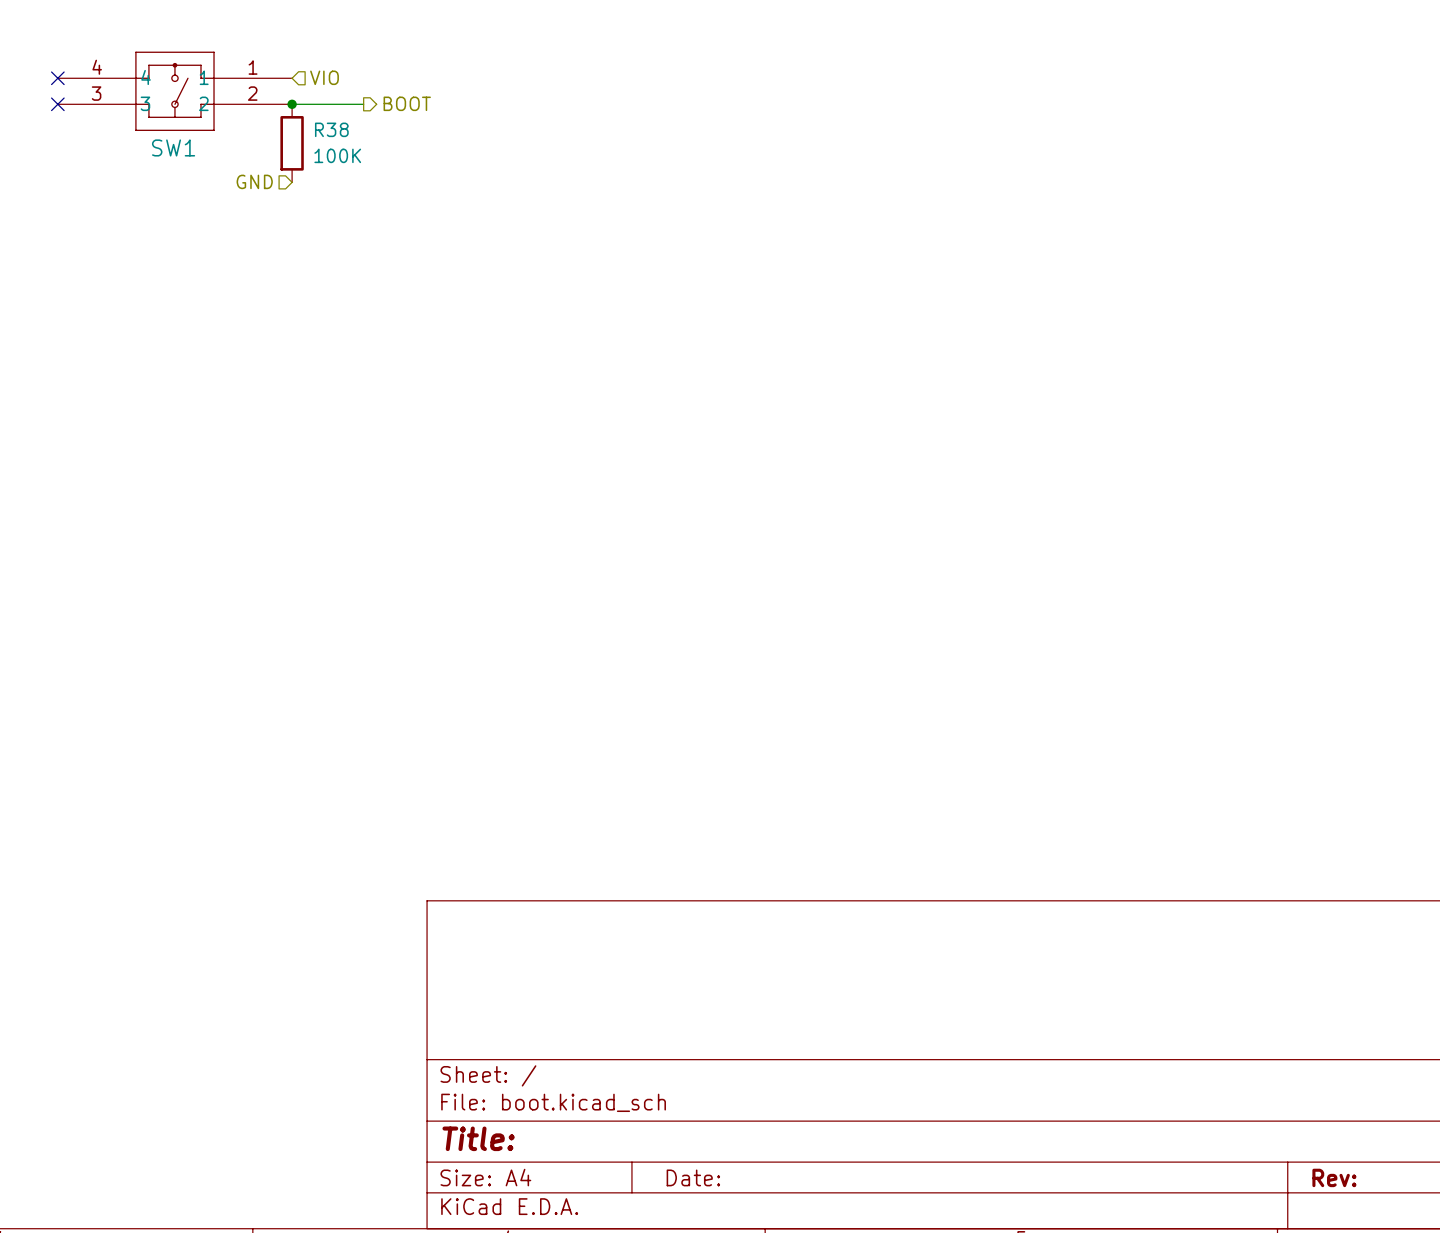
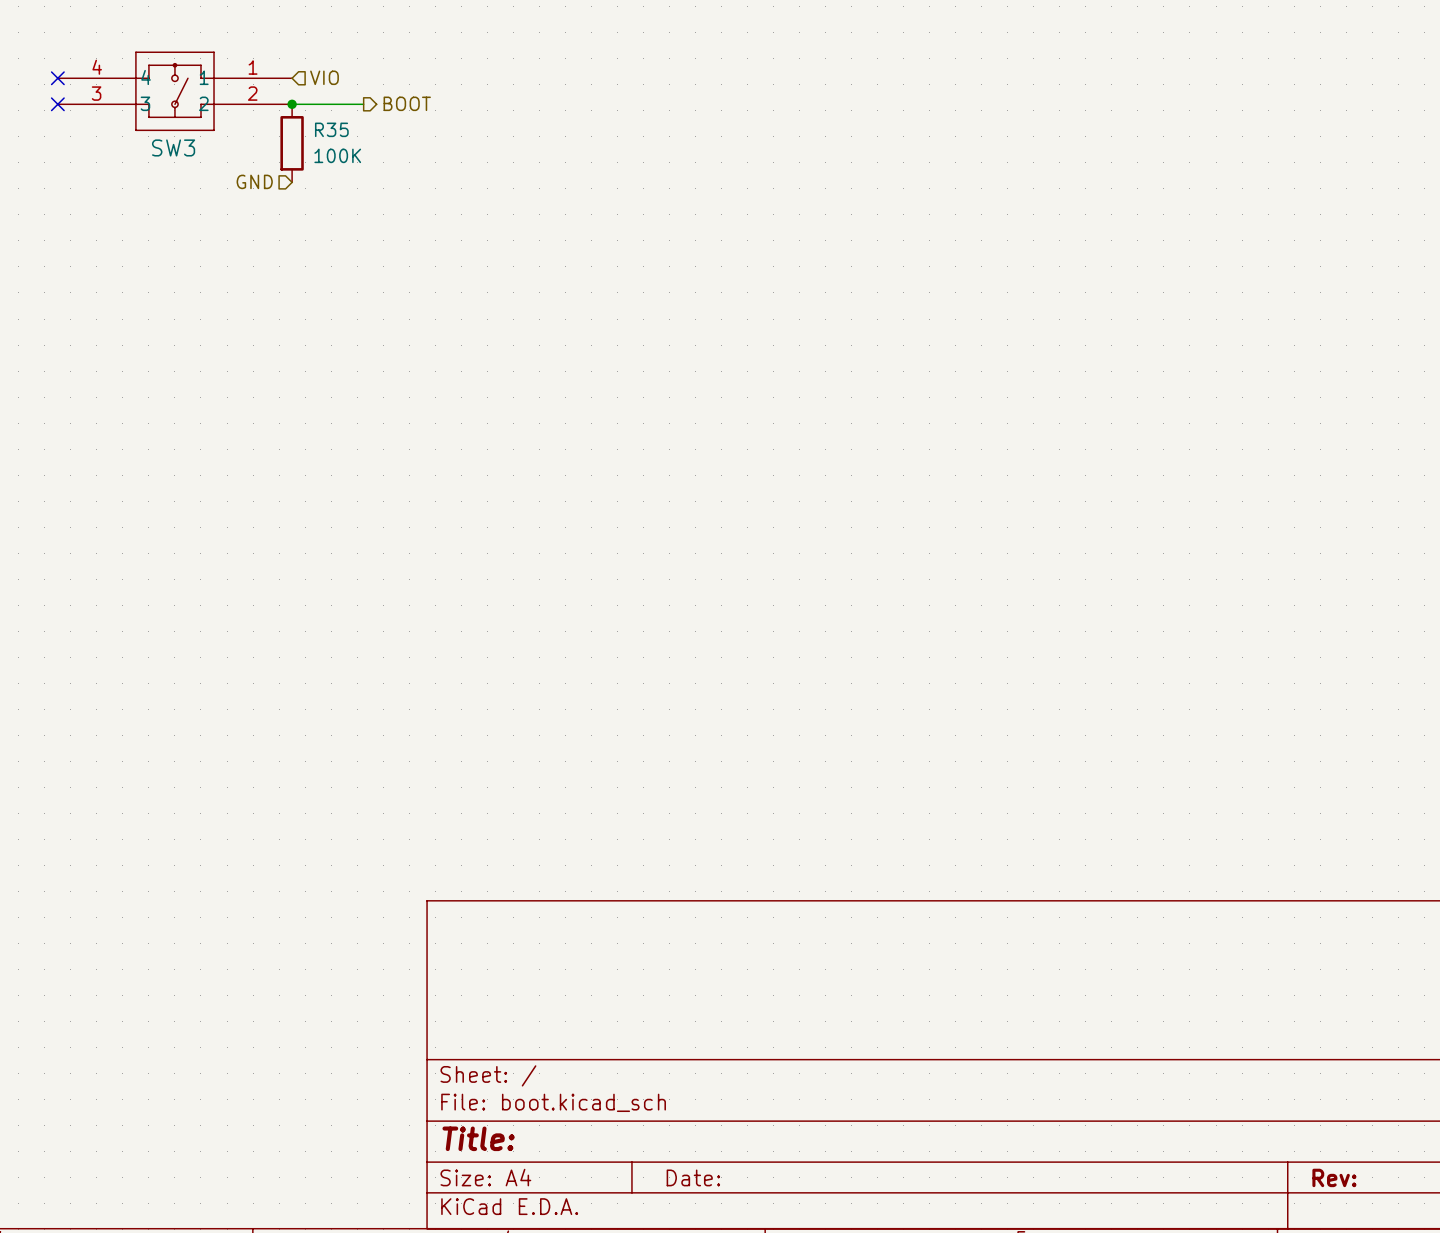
R38 name: R38 (331, 129) -> R35 (331, 129)
SW1 name: SW1 (173, 147) -> SW3 (173, 147)

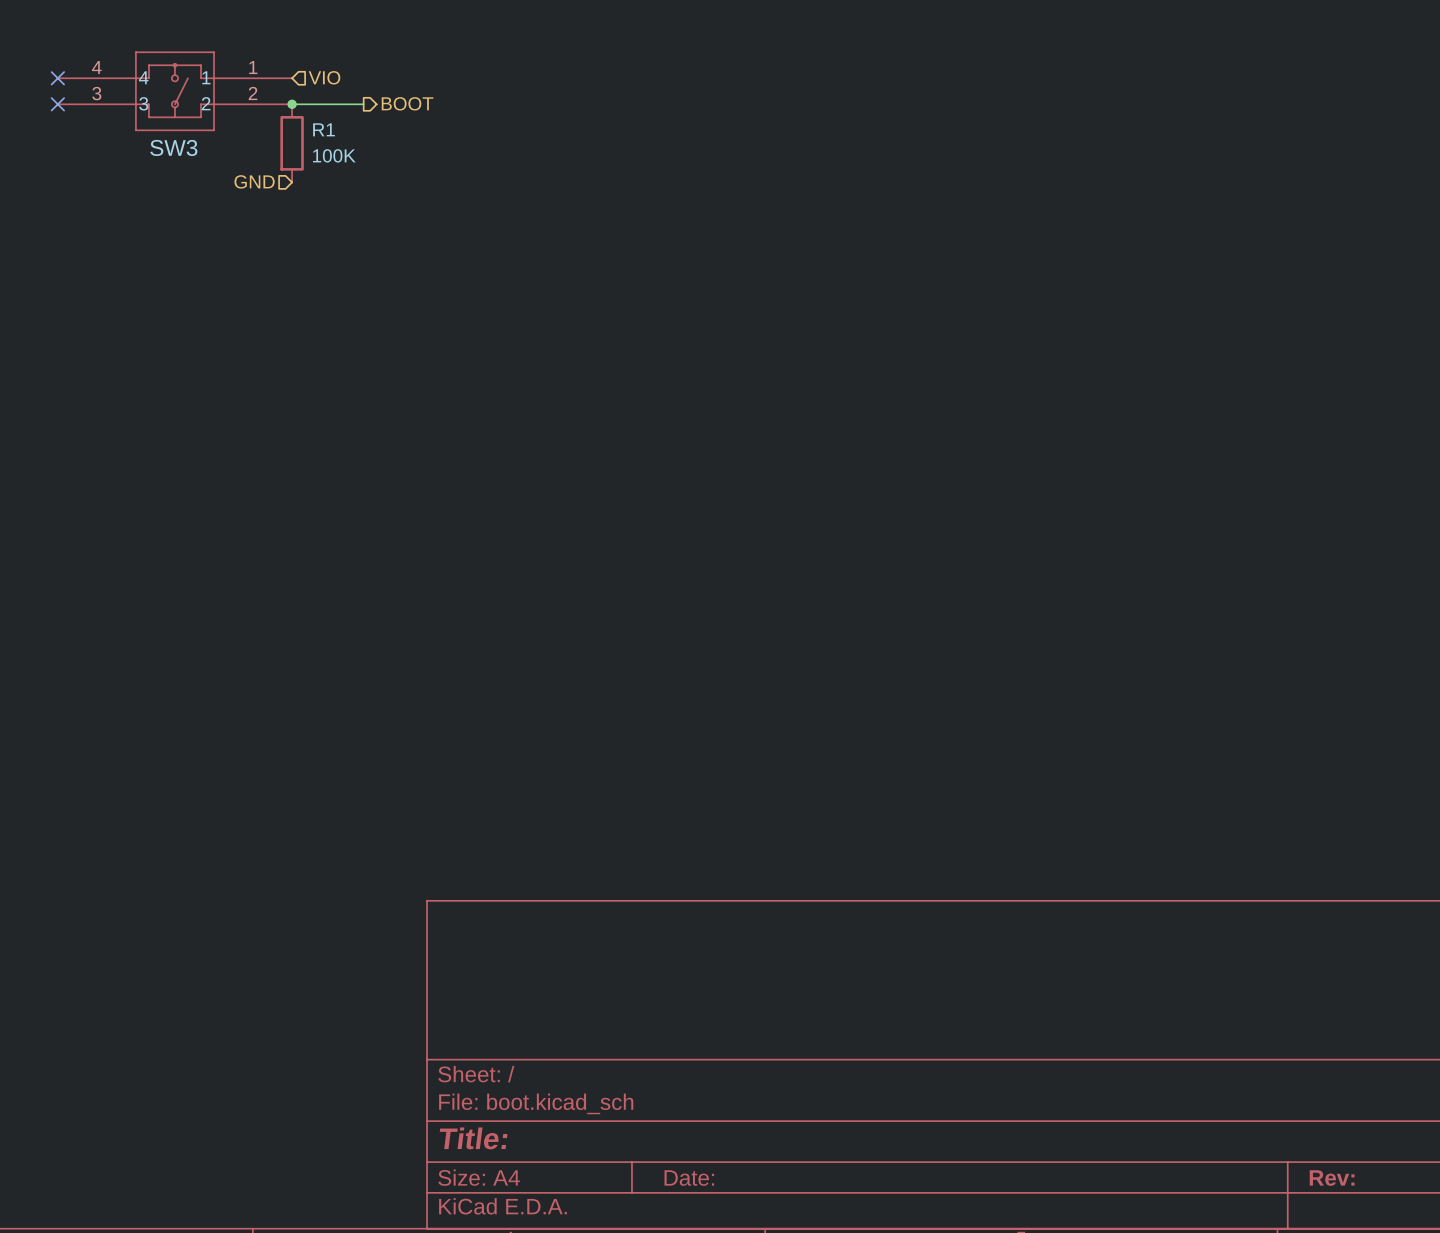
R35 name: R35 (331, 129) -> R1 (324, 129)

